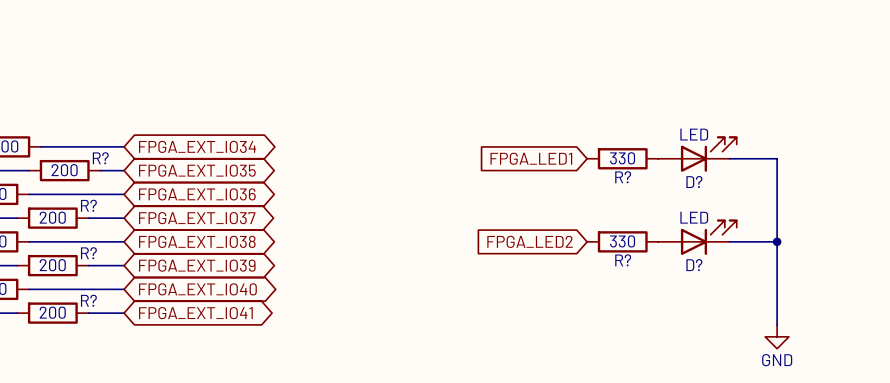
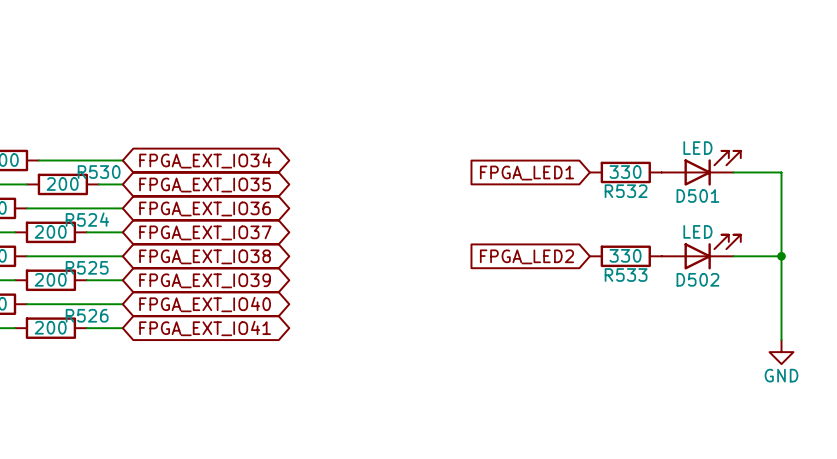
R? name: R? (100, 158) -> R530 (99, 172)
R? name: R? (623, 177) -> R532 (626, 191)
D? name: D? (694, 181) -> D501 (697, 195)
R? name: R? (88, 205) -> R524 (87, 219)
R? name: R? (88, 253) -> R525 (87, 267)
R? name: R? (623, 260) -> R533 (626, 275)
D? name: D? (694, 265) -> D502 (697, 279)
R? name: R? (88, 300) -> R526 (87, 315)

